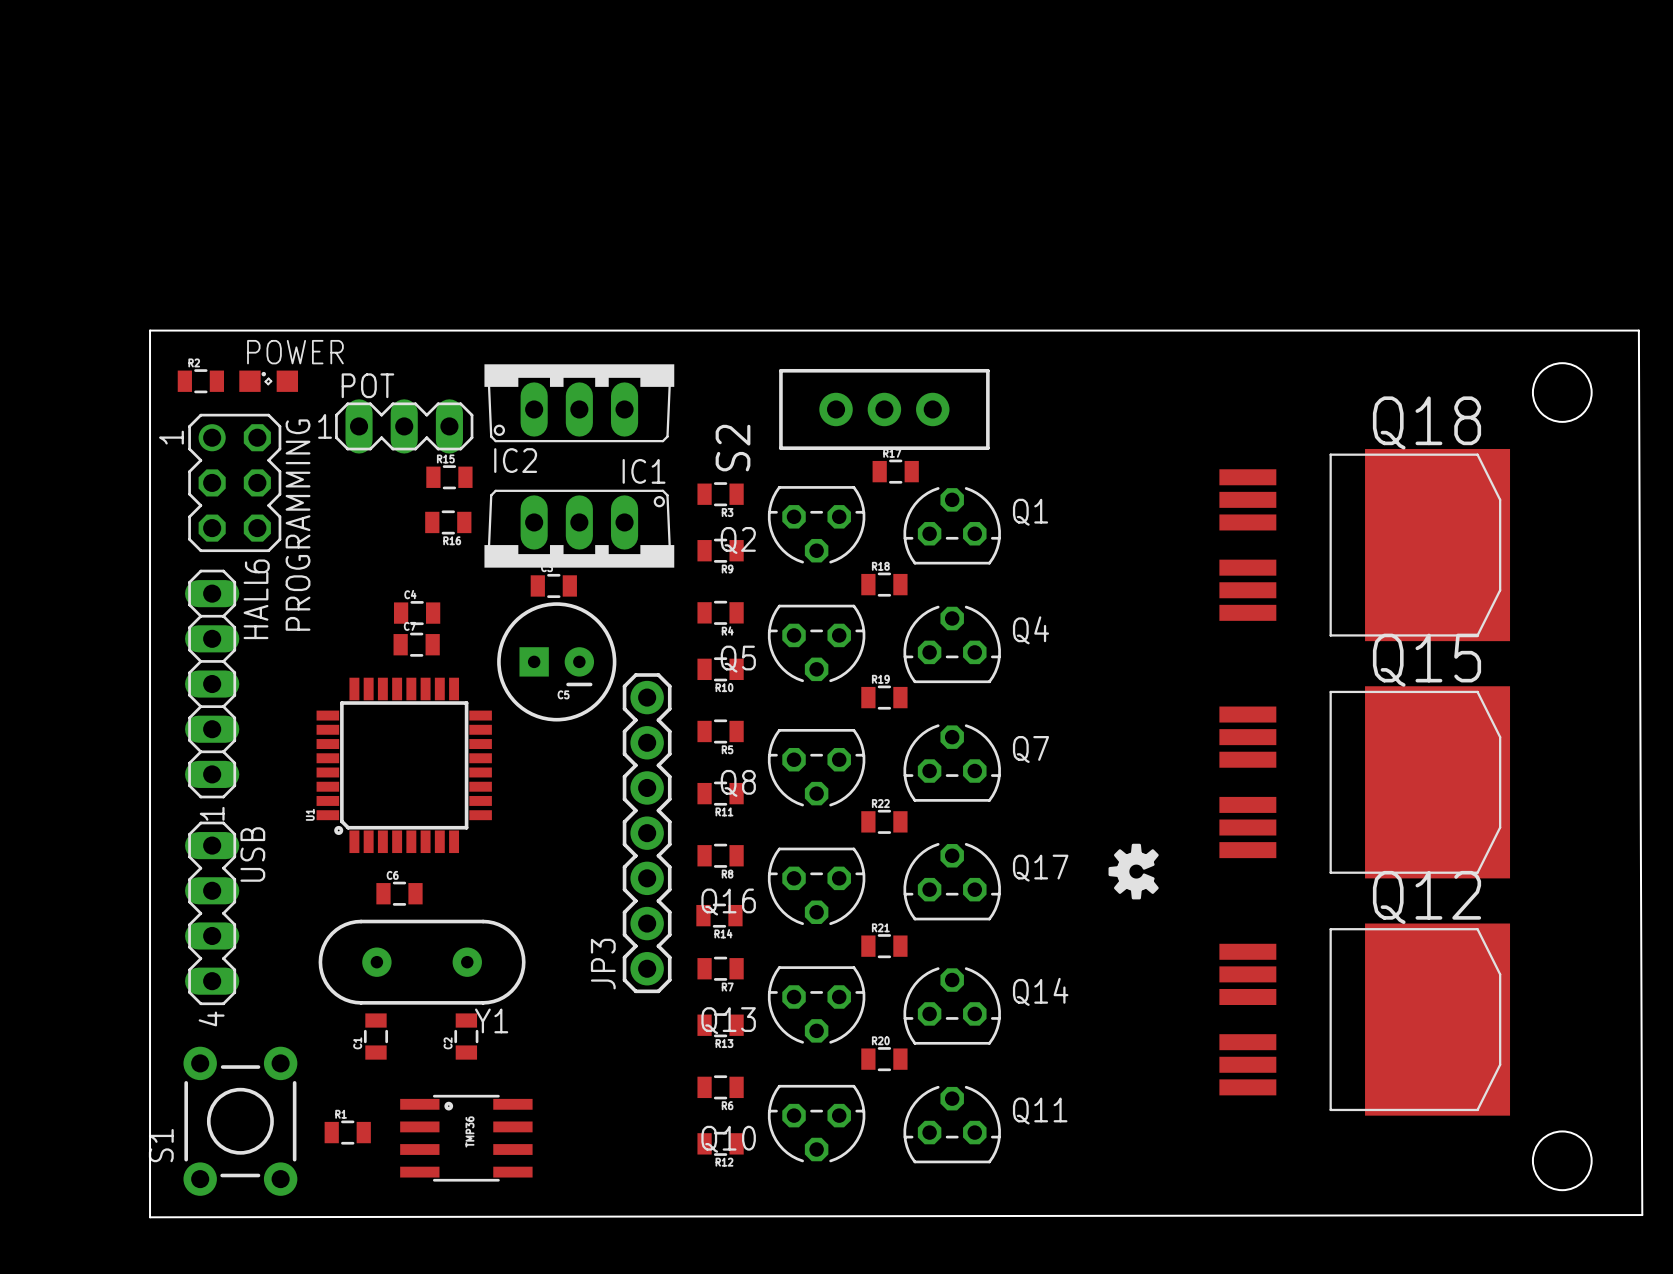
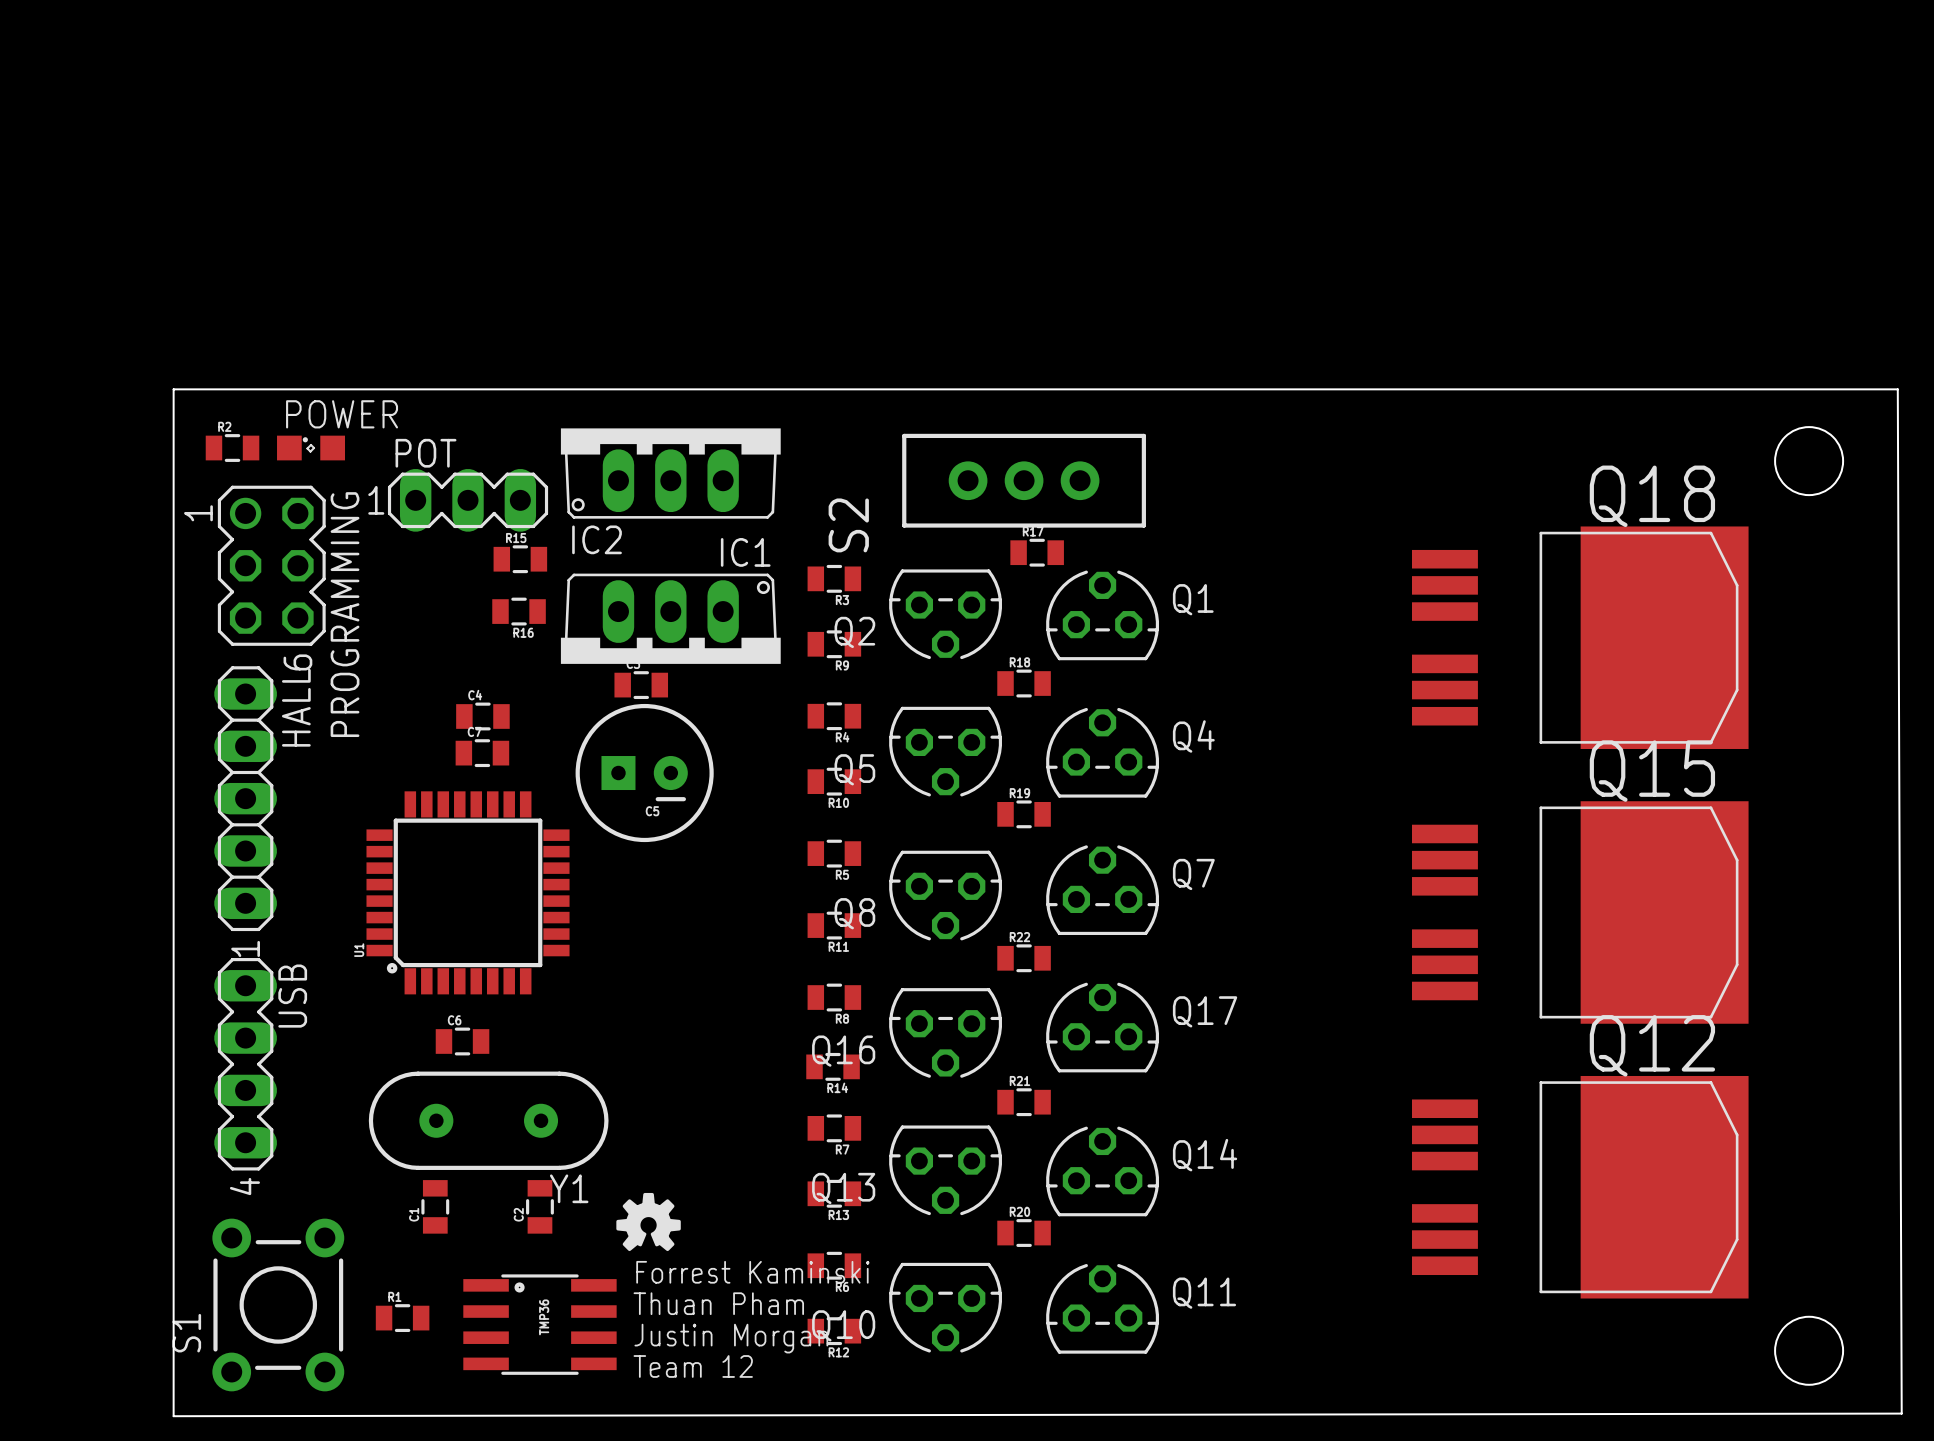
JP3: (647, 833) -> none
drawing: [1108, 843, 1159, 900] -> none
drawing: none -> [616, 1192, 681, 1252]
text: none -> Forrest Kaminski (752, 1272)
text: none -> Thuan Pham (718, 1303)
text: none -> Justin Morgan (731, 1338)
text: none -> Team 12 (693, 1366)

